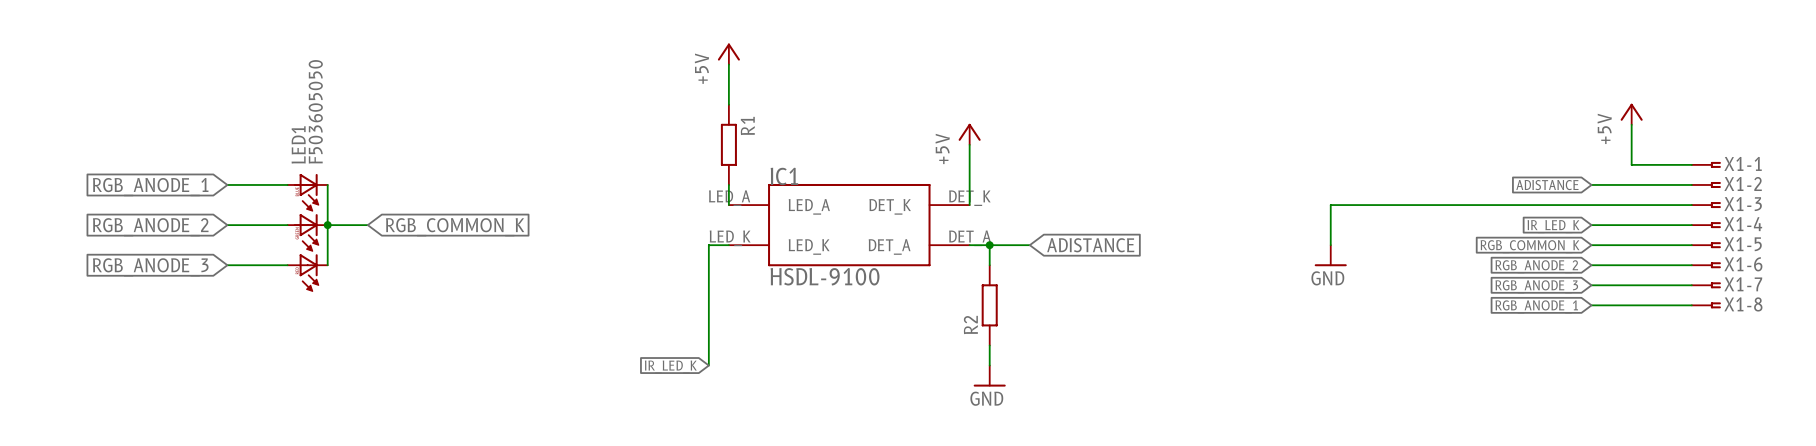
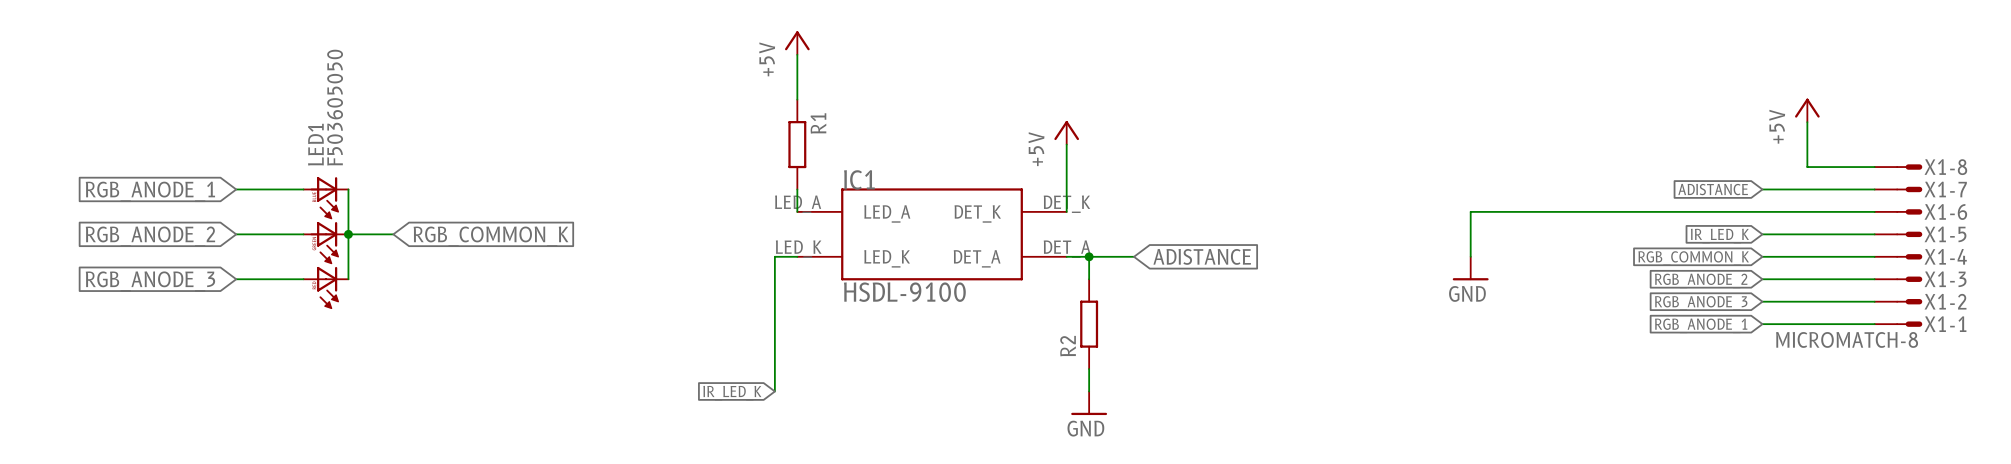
X1-1 symbol: [1691, 161, 1721, 168] -> [1874, 321, 1923, 327]
X1-2 symbol: [1691, 181, 1721, 189] -> [1874, 299, 1923, 305]
X1-3 symbol: [1691, 202, 1721, 209] -> [1874, 276, 1923, 282]
X1-4 symbol: [1691, 222, 1721, 229] -> [1874, 254, 1923, 260]
X1-5 symbol: [1691, 242, 1721, 249] -> [1874, 231, 1923, 238]
X1-6 symbol: [1691, 262, 1721, 269] -> [1874, 209, 1923, 215]
X1-7 symbol: [1691, 282, 1721, 289] -> [1874, 186, 1923, 193]
X1-8 symbol: [1691, 302, 1721, 309] -> [1874, 164, 1923, 170]
X1-1 value: none -> MICROMATCH-8 (1847, 339)

